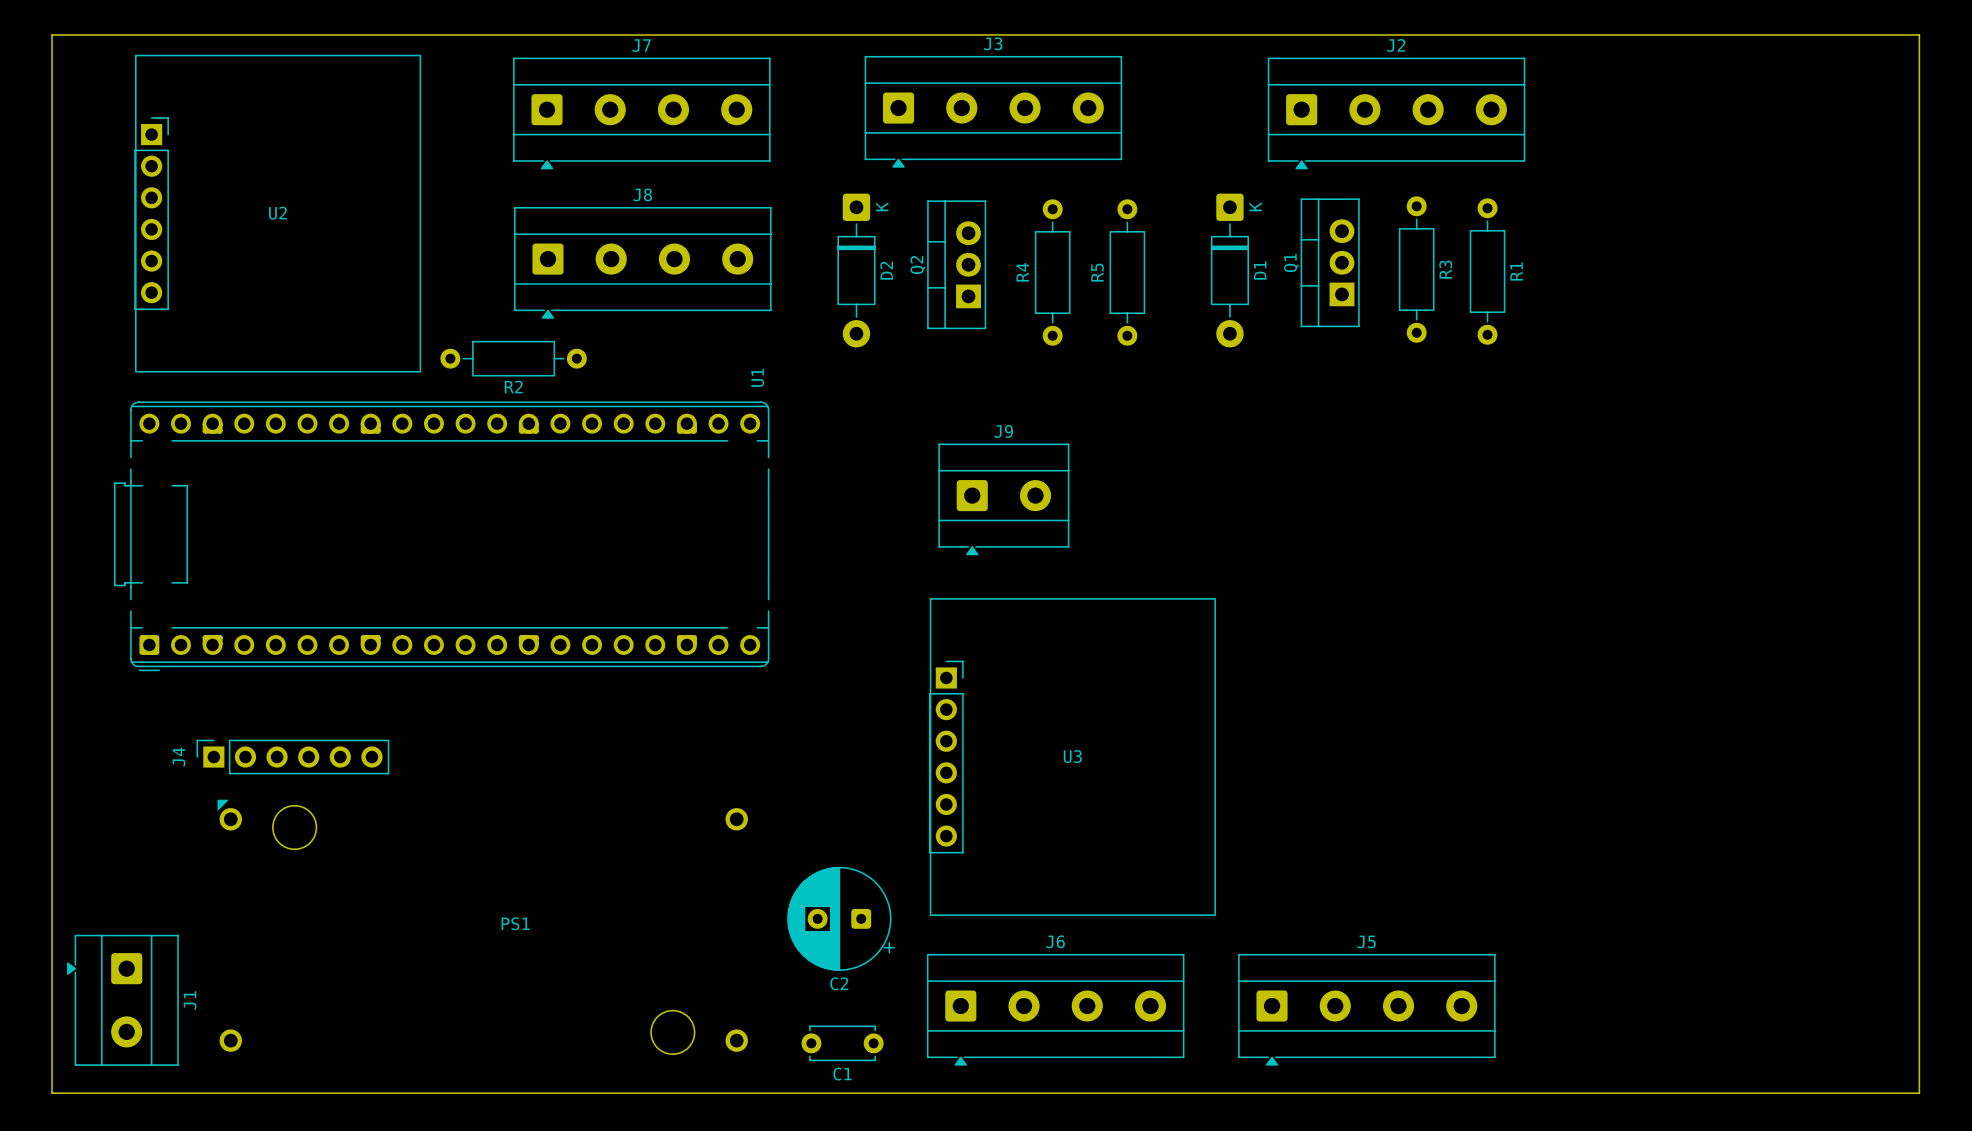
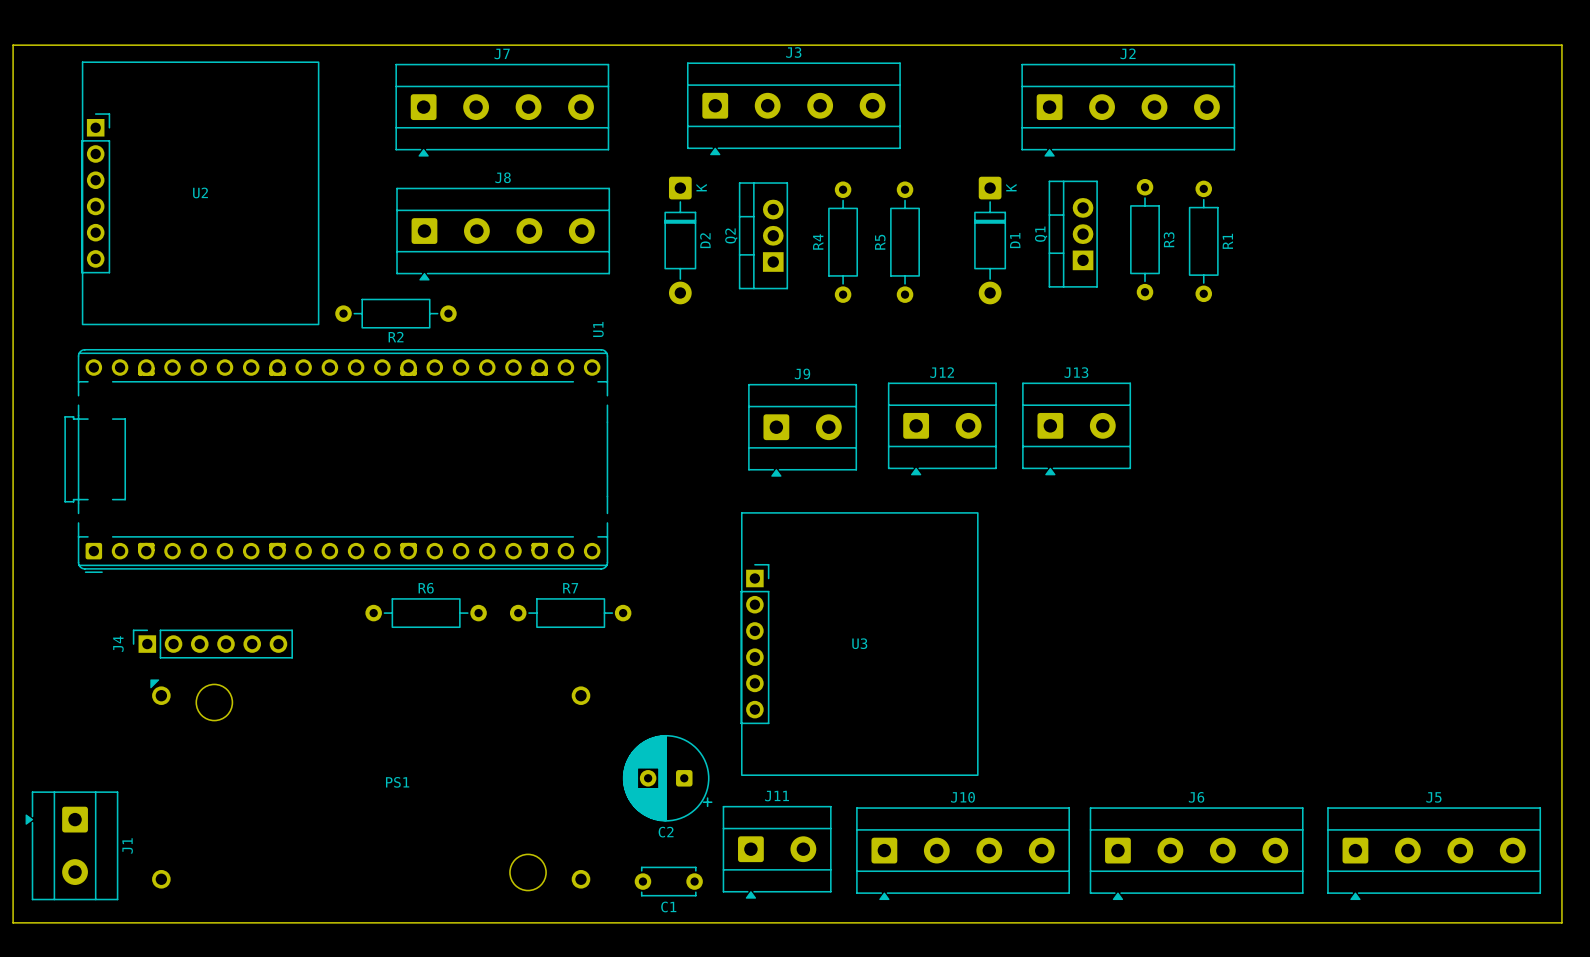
J12: none -> (942, 429)
J13: none -> (1076, 429)
R6: none -> (426, 613)
R7: none -> (570, 613)
J11: none -> (777, 852)
J6 position: (1055, 1009) -> (1196, 853)
J10: none -> (963, 853)
J5 position: (1366, 1009) -> (1434, 853)

